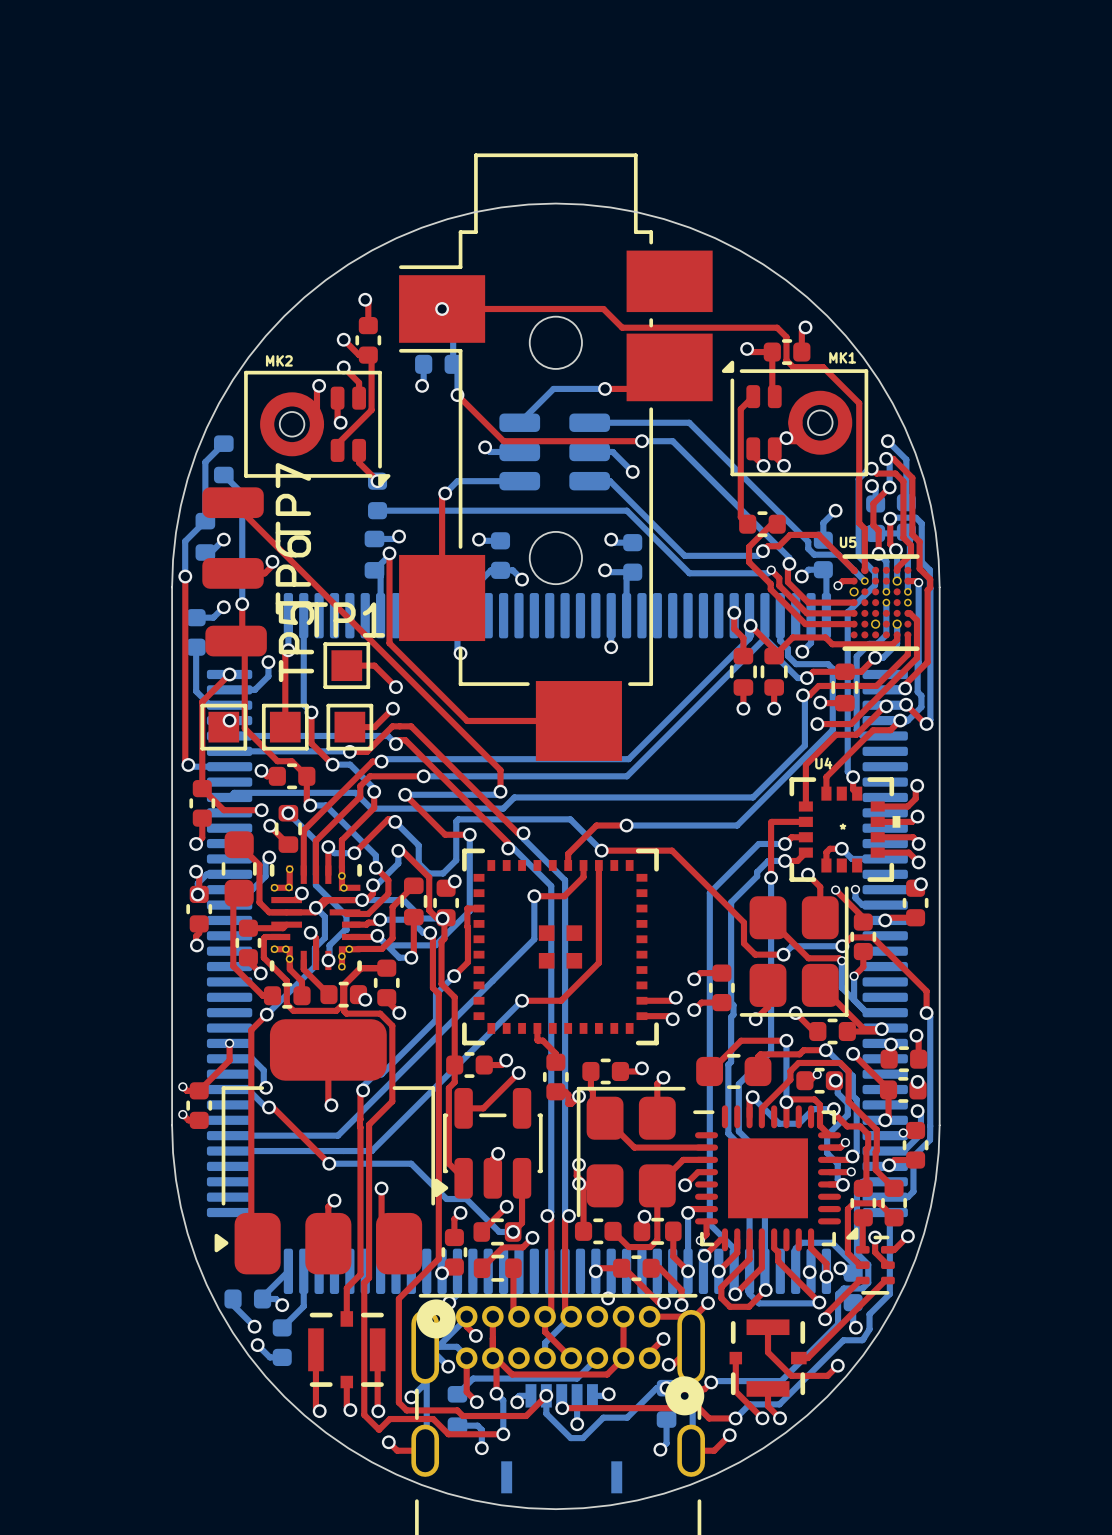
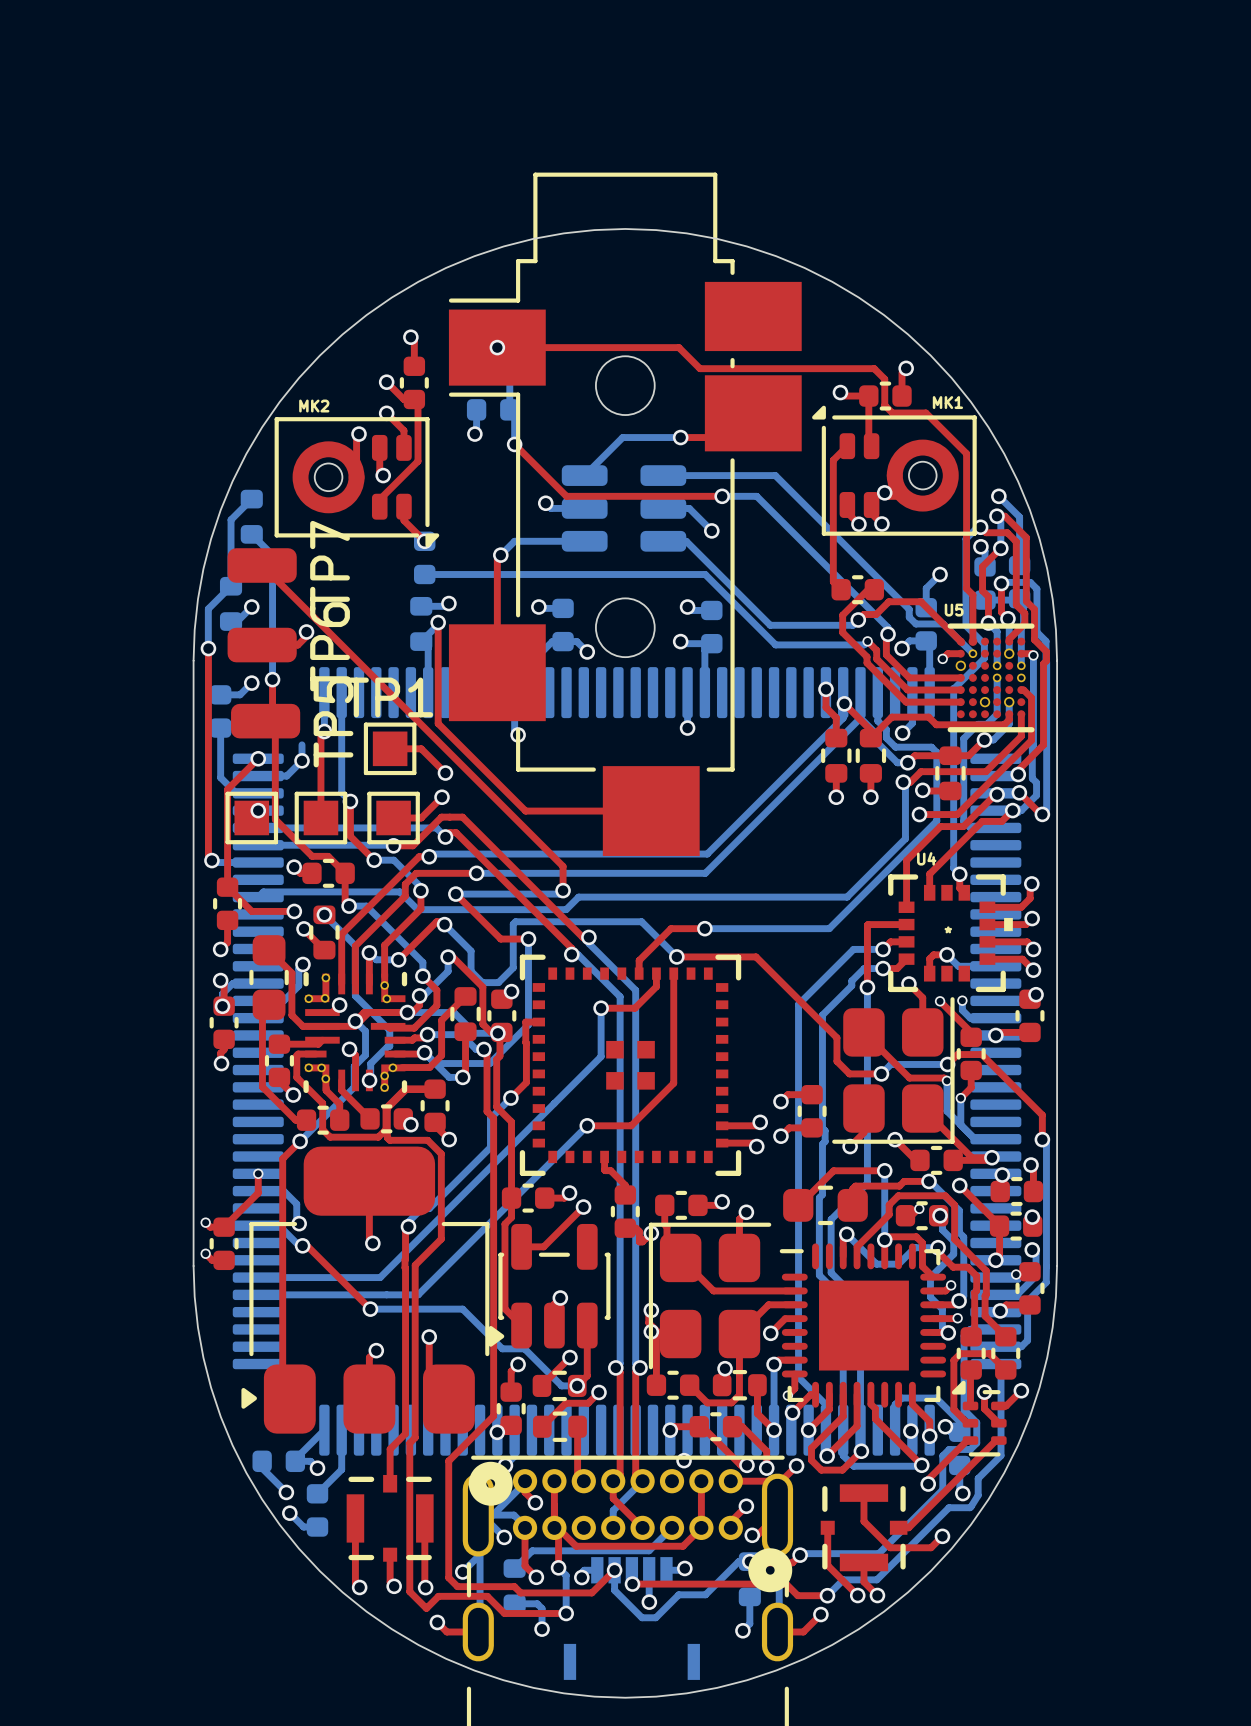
via position: (268, 662) -> (302, 760)

